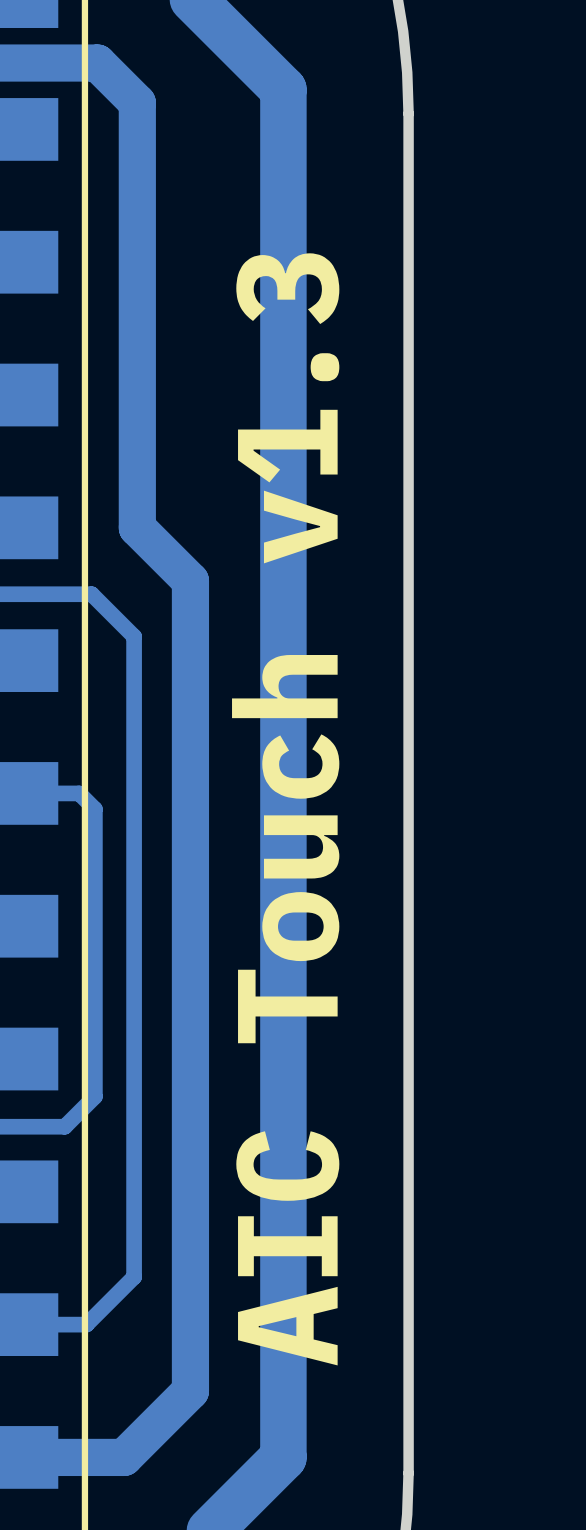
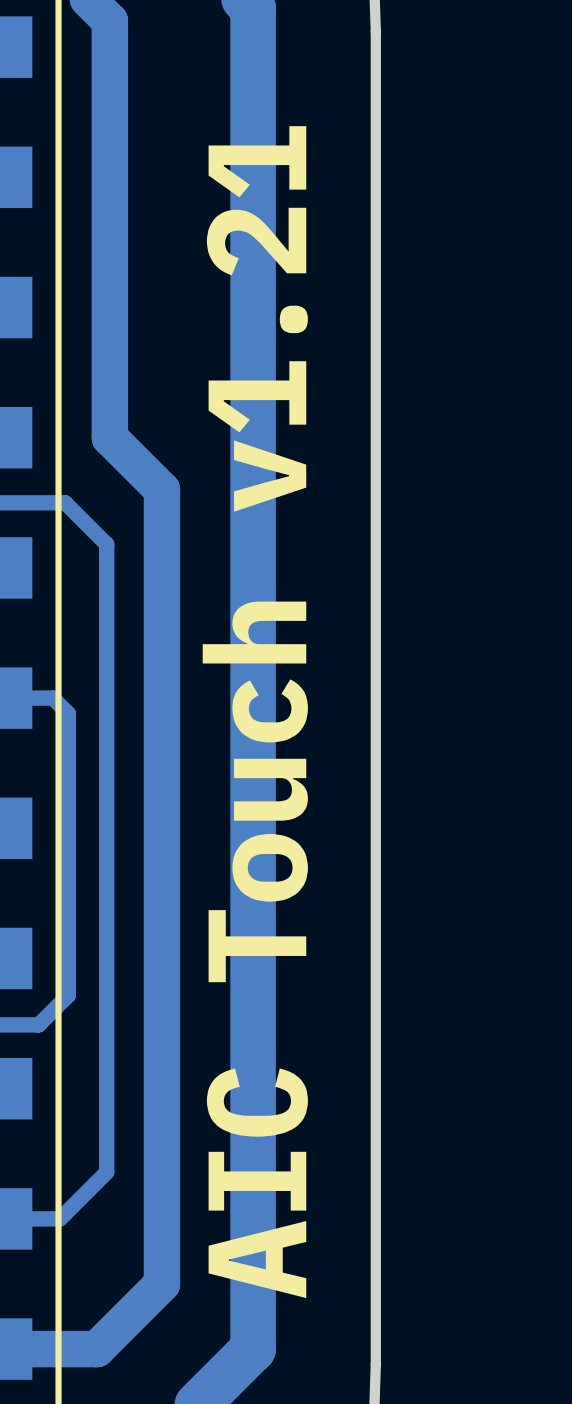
text: AIC Touch v1.3 (285, 809) -> AIC Touch v1.21 (255, 712)

